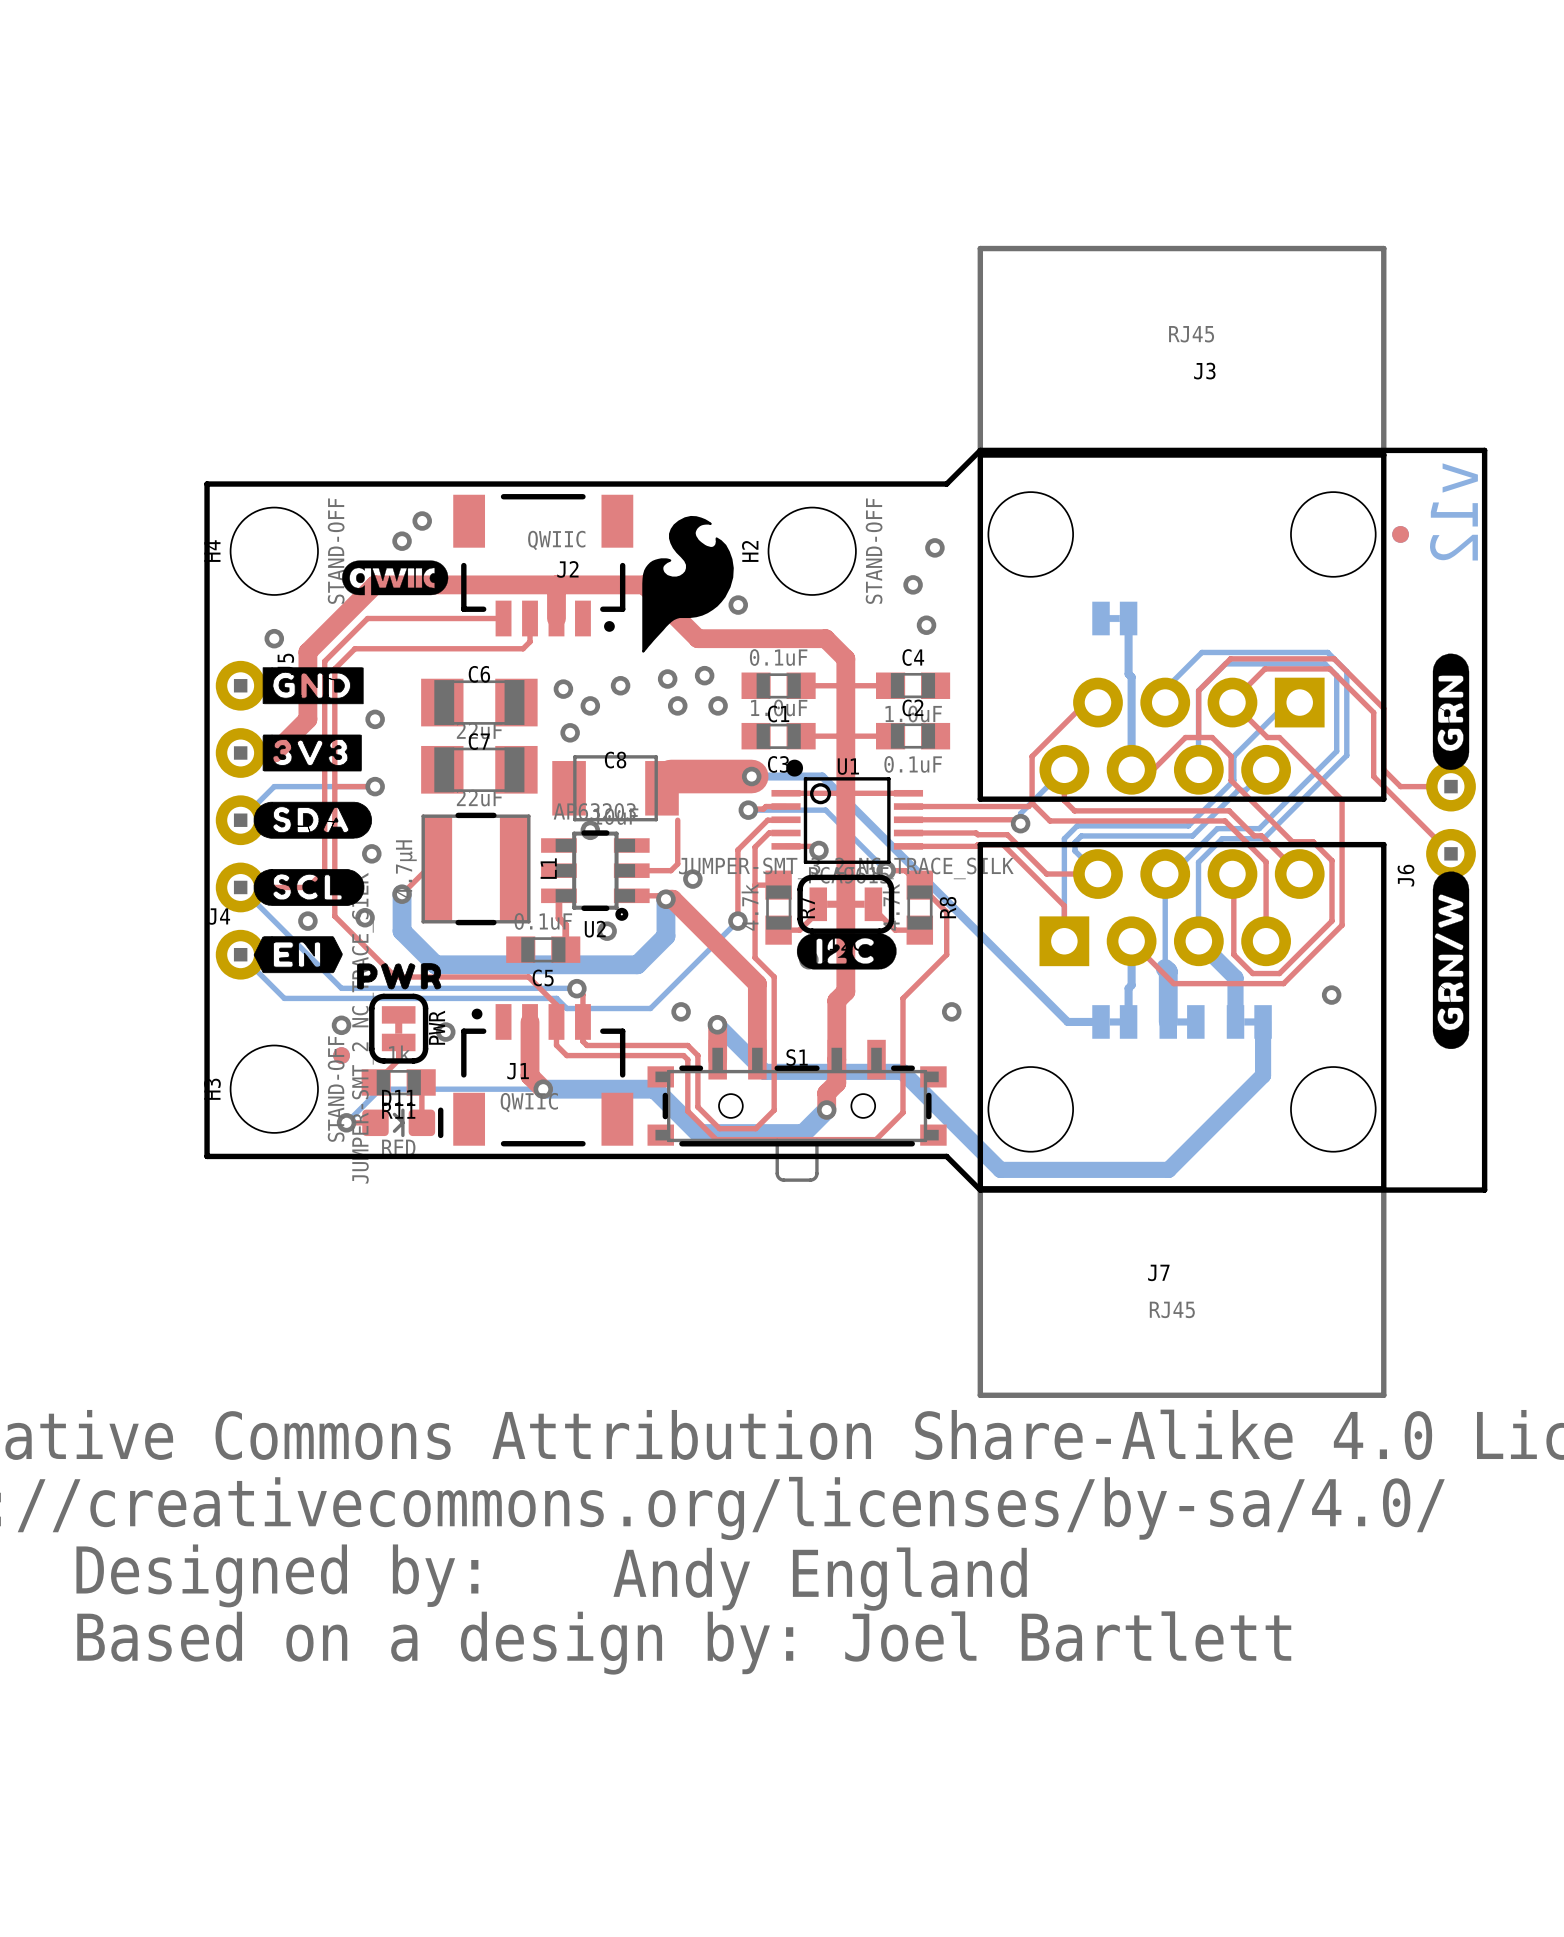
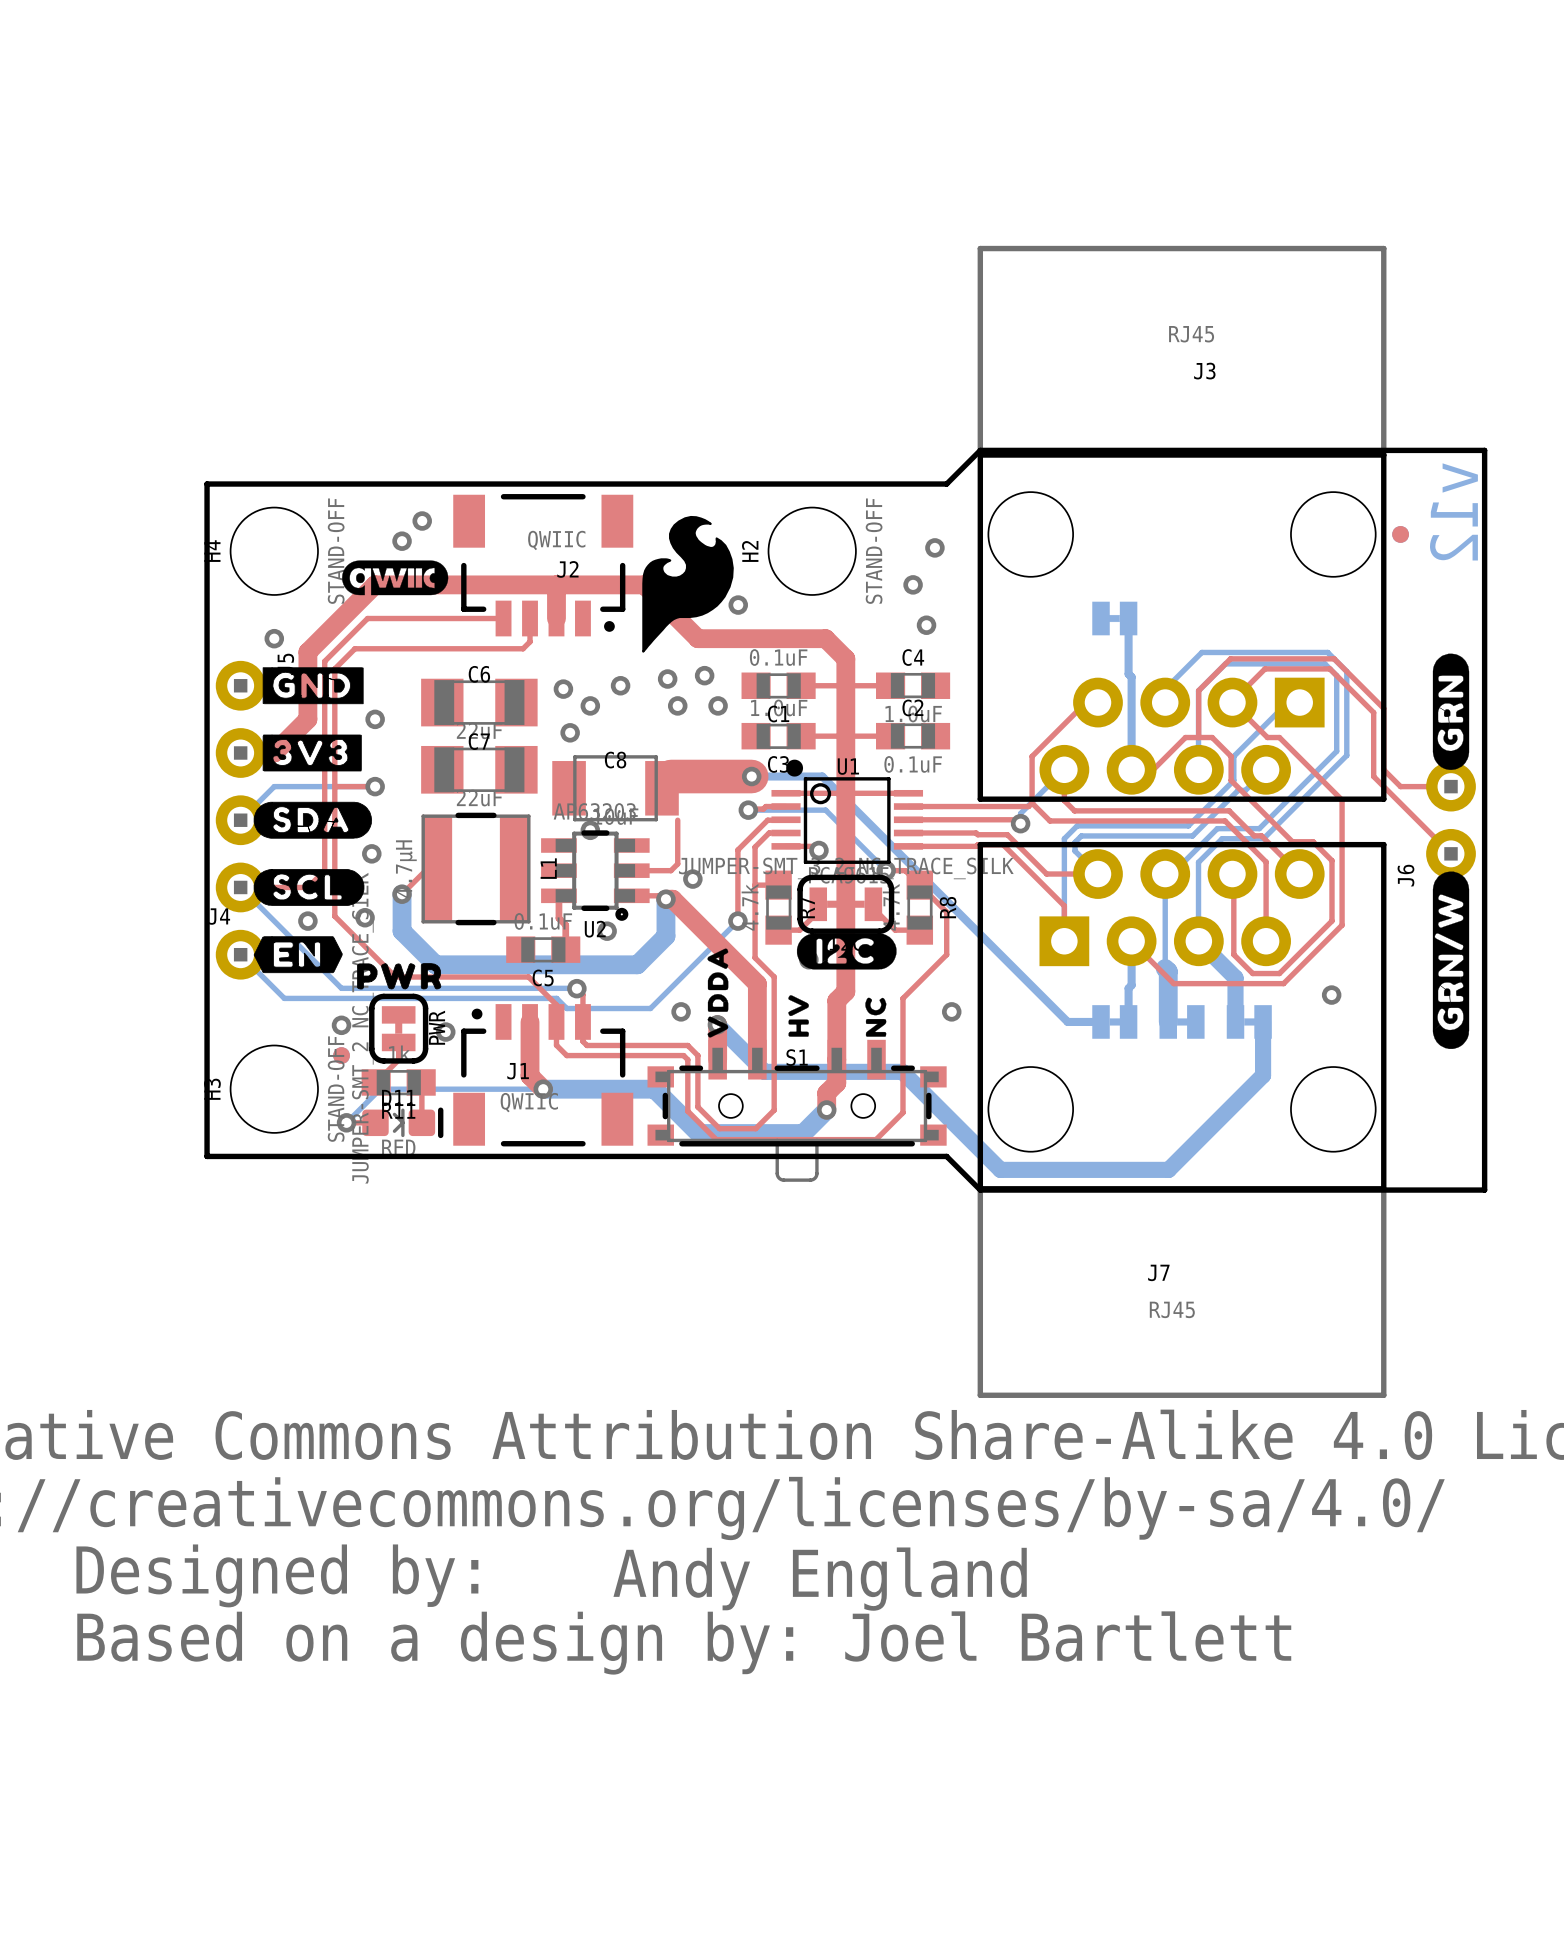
drawing: none -> [707, 948, 729, 1038]
drawing: none -> [788, 995, 809, 1037]
drawing: none -> [865, 997, 887, 1037]

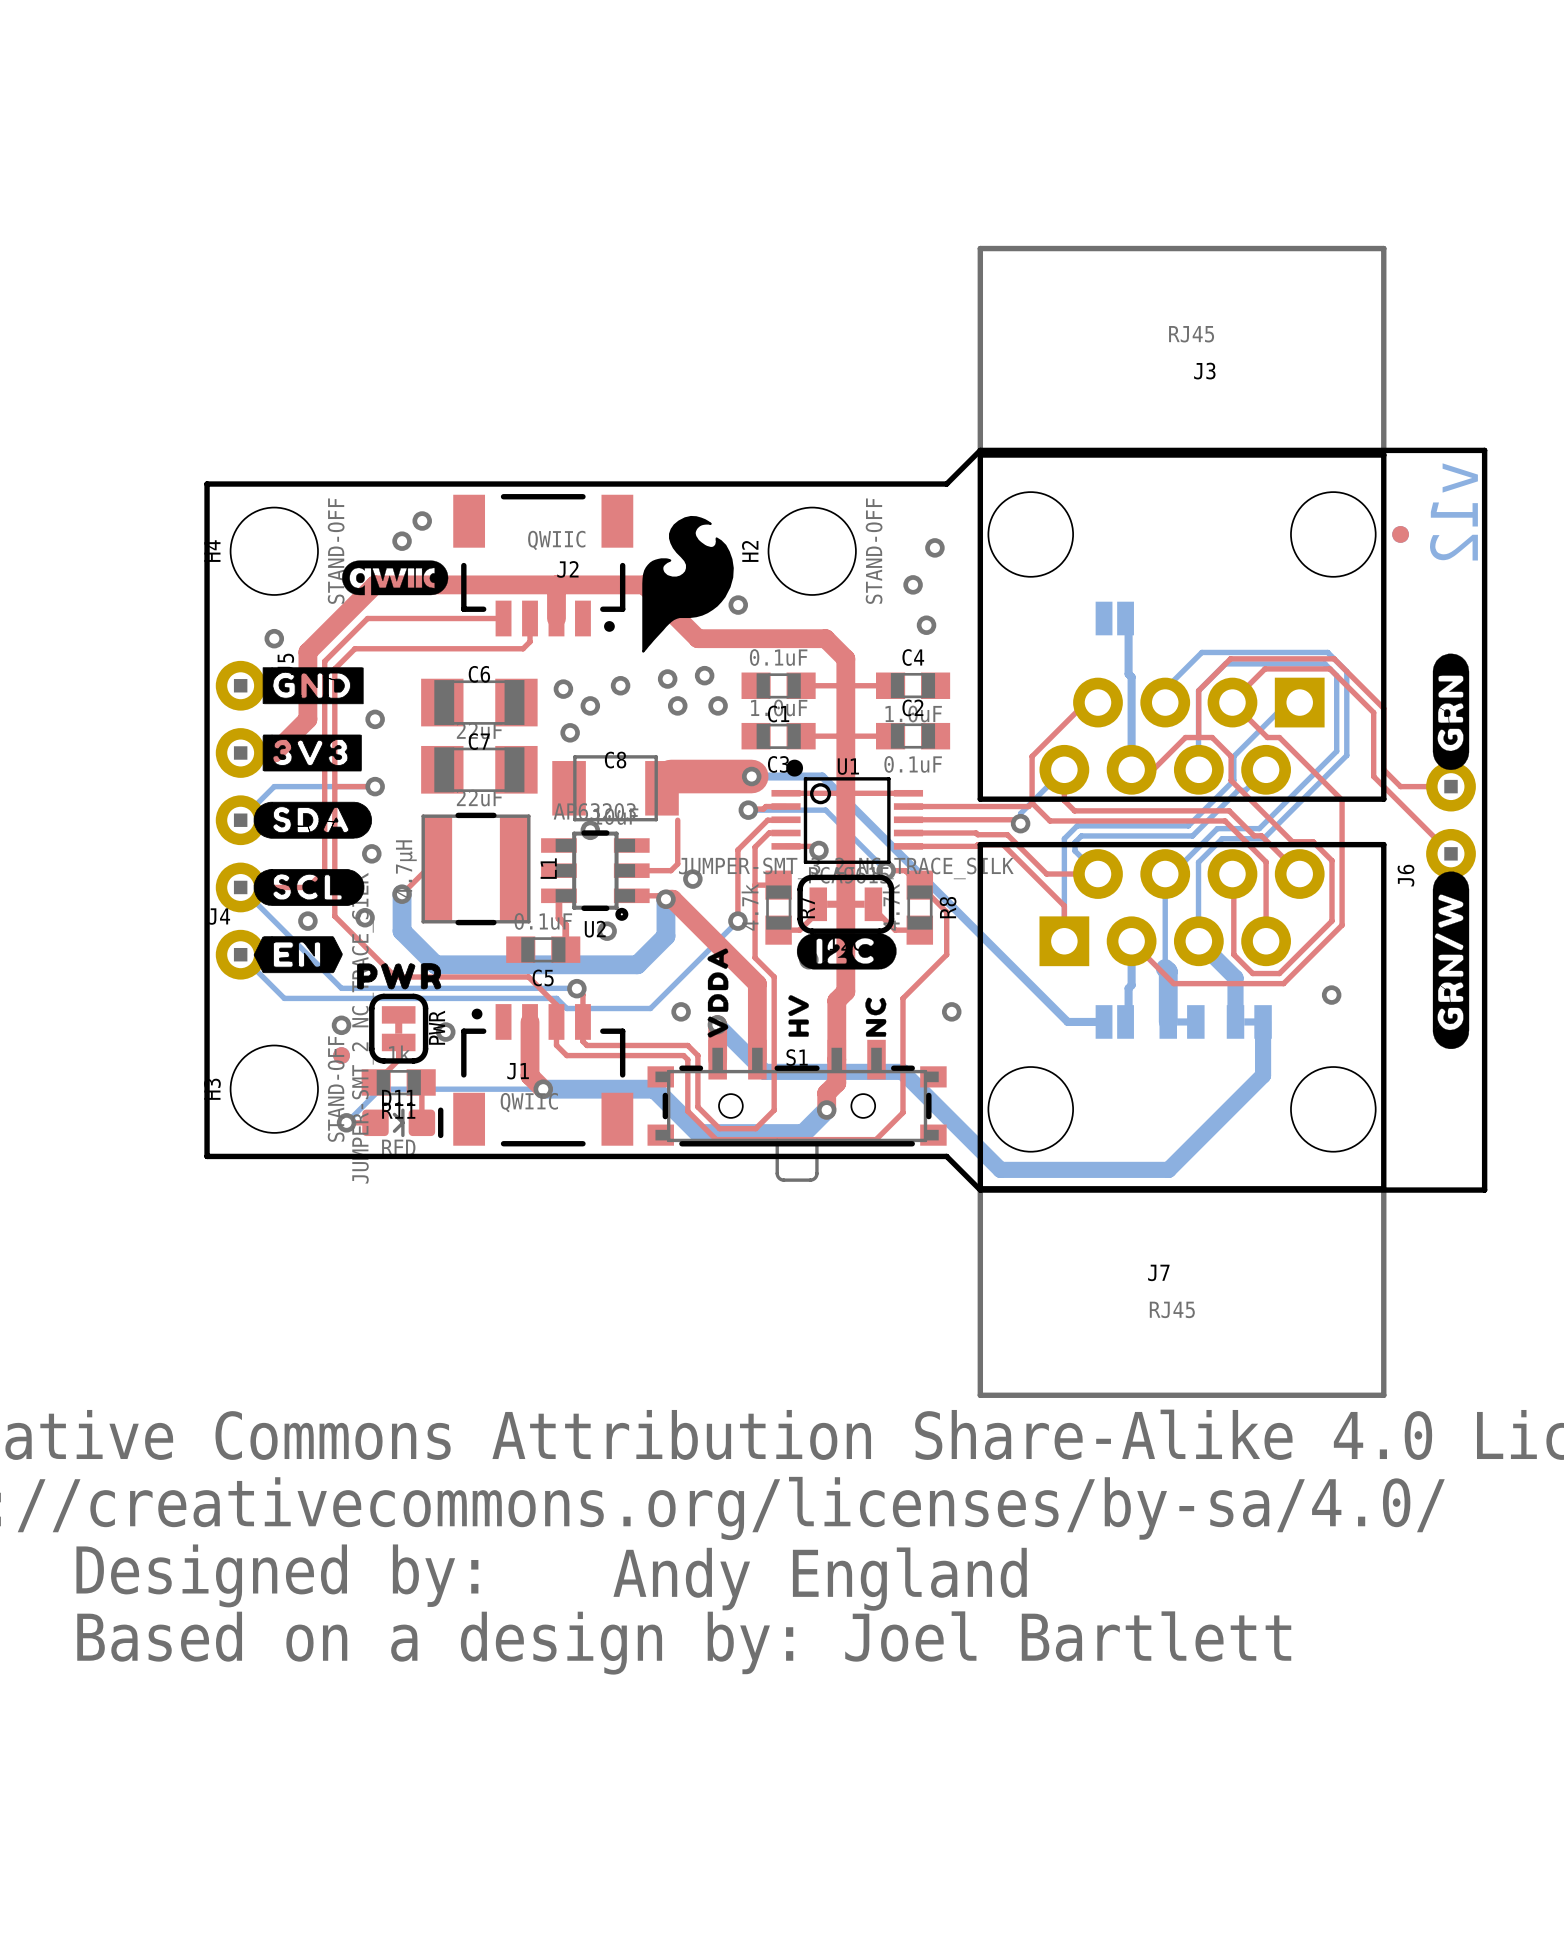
part footprint: [1092, 601, 1138, 636] -> [1095, 601, 1134, 636]
part footprint: [1092, 1005, 1138, 1039] -> [1095, 1005, 1134, 1039]

